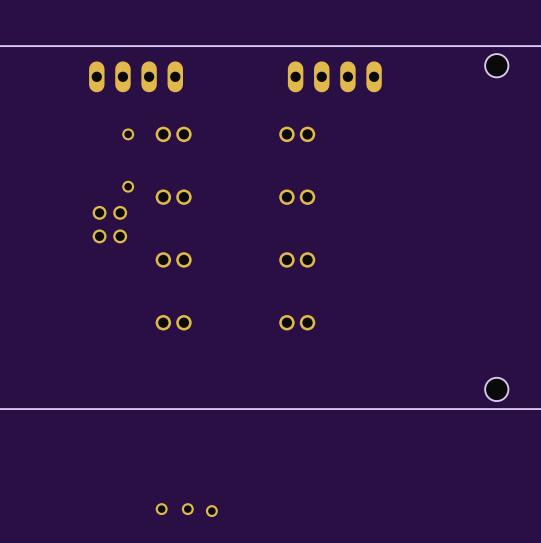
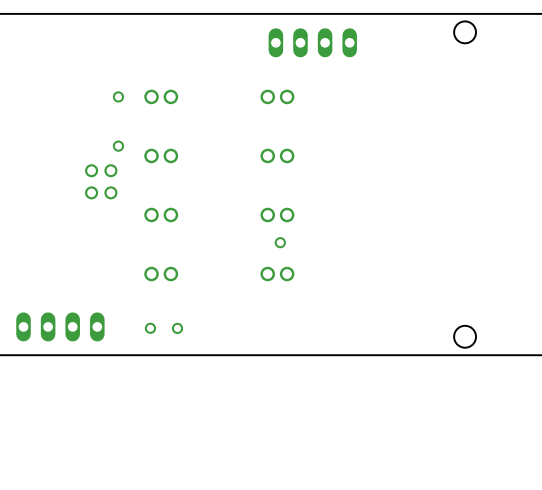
part: (136, 76) -> none
part: none -> (280, 242)
part: none -> (60, 326)
part: none -> (150, 328)
part: none -> (177, 328)
part: (161, 509) -> none
part: (187, 509) -> none
part: (211, 511) -> none

